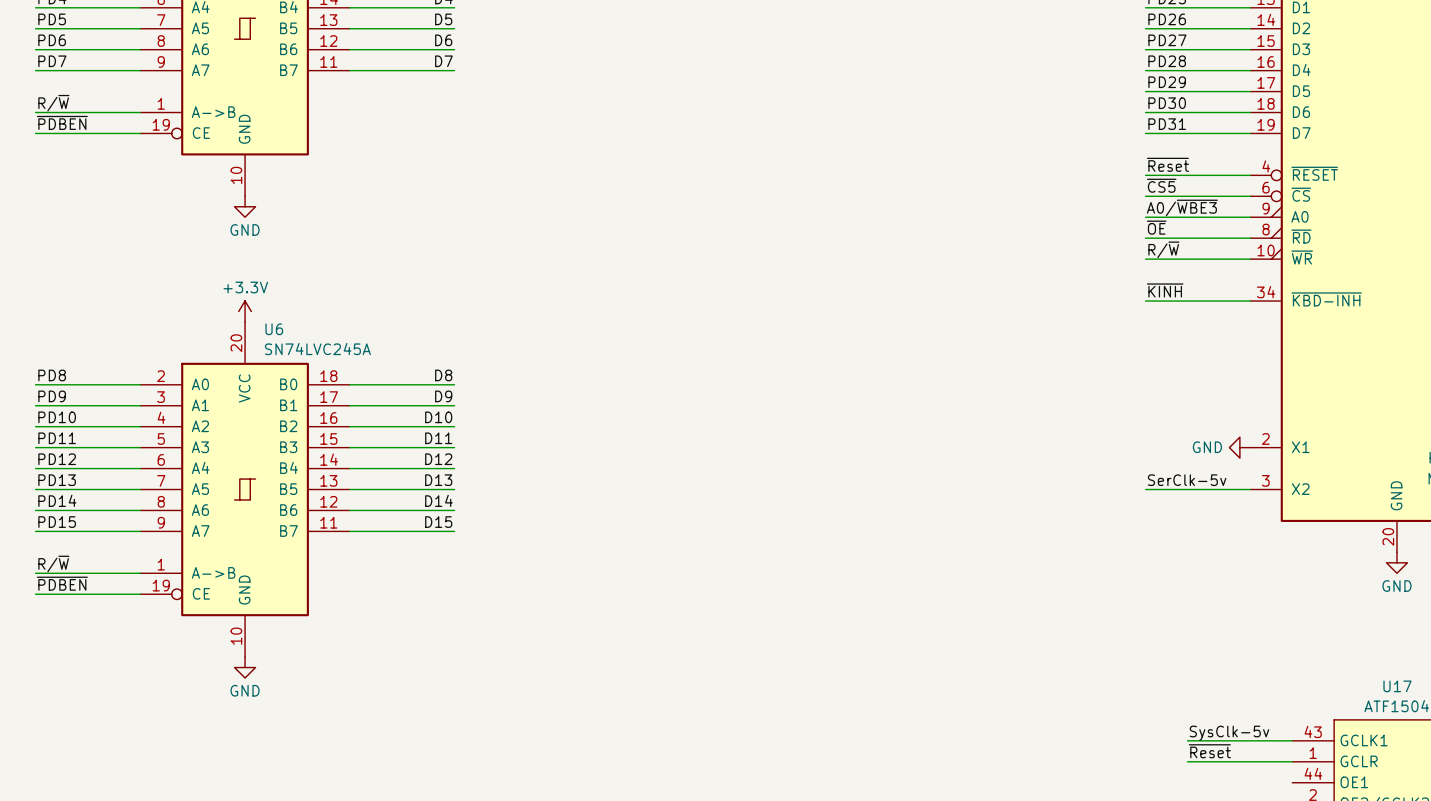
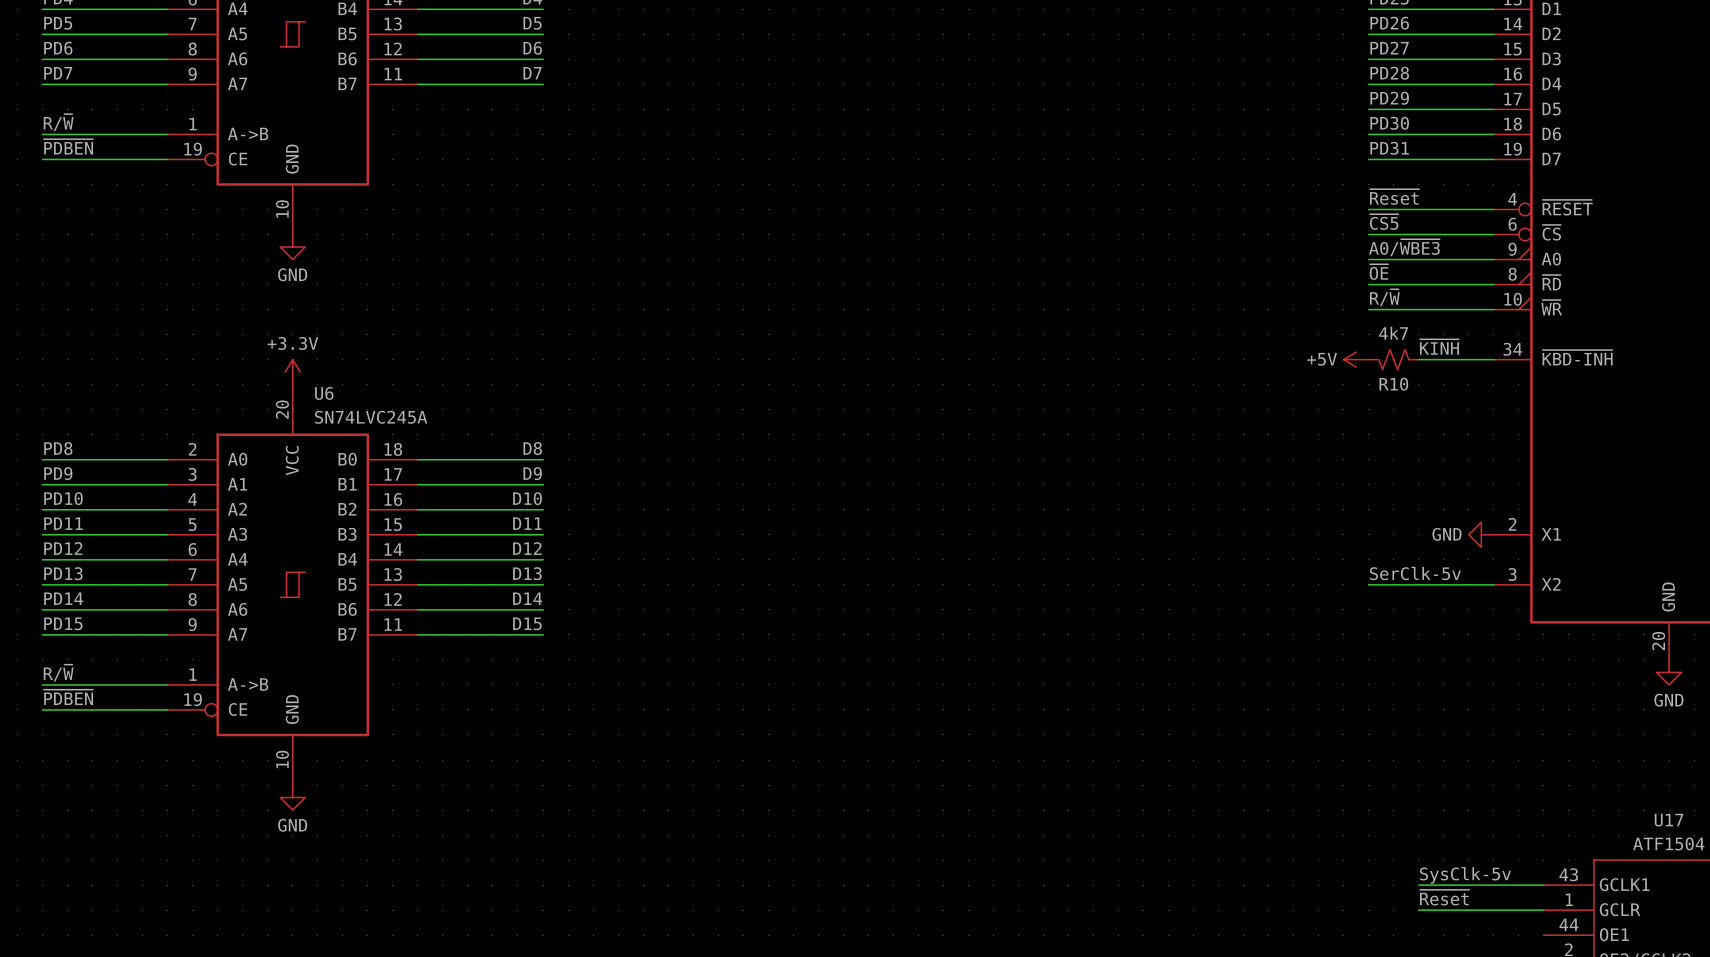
label position: ~{KINH} (1165, 290) -> ~{KINH} (1439, 347)
power symbol: none -> +5V (1356, 359)
R10: none -> 4k7 (1393, 359)

